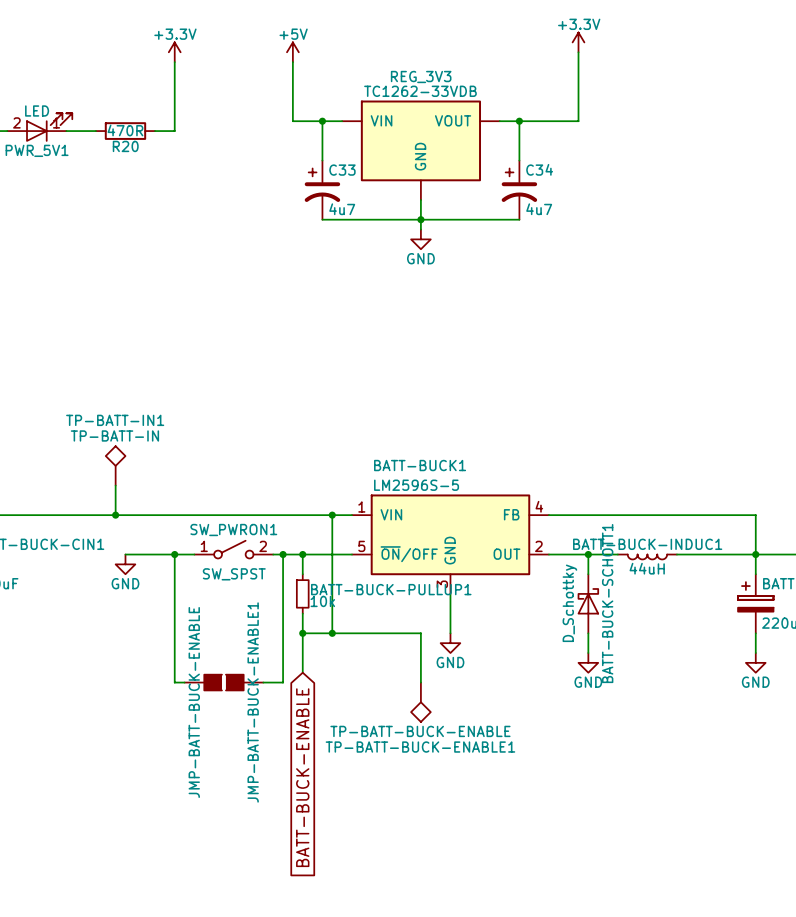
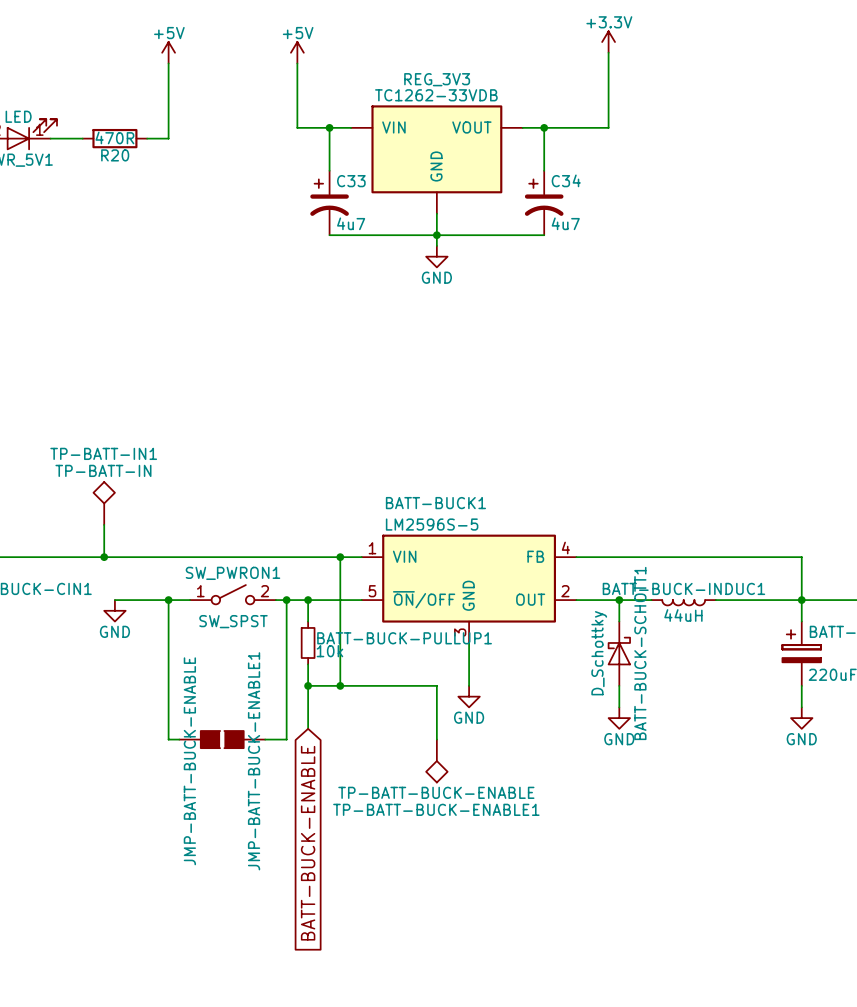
power symbol: +3.3V (174, 52) -> +5V (168, 52)

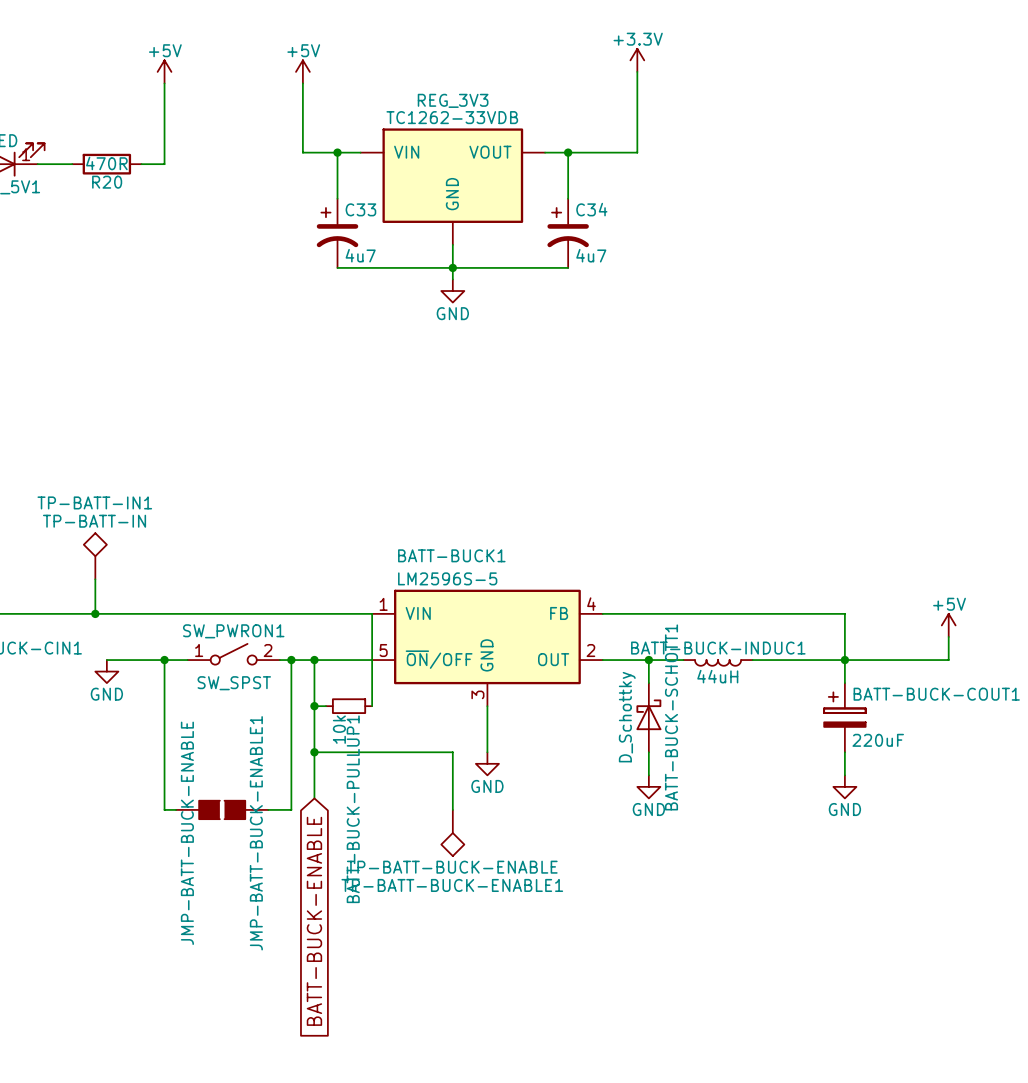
wire: (340, 557) (340, 685) -> none
junction: (340, 557) -> none
wire: none -> (372, 613) (372, 706)
wire: none -> (314, 683) (314, 729)
wire: none -> (314, 706) (325, 706)
BATT-BUCK-PULLUP1 rotation: 0° (308, 642) -> 90° clockwise (349, 706)
BATT-BUCK-PULLUP1 position: (308, 642) -> (349, 706)
junction: none -> (314, 706)
junction: (340, 685) -> none

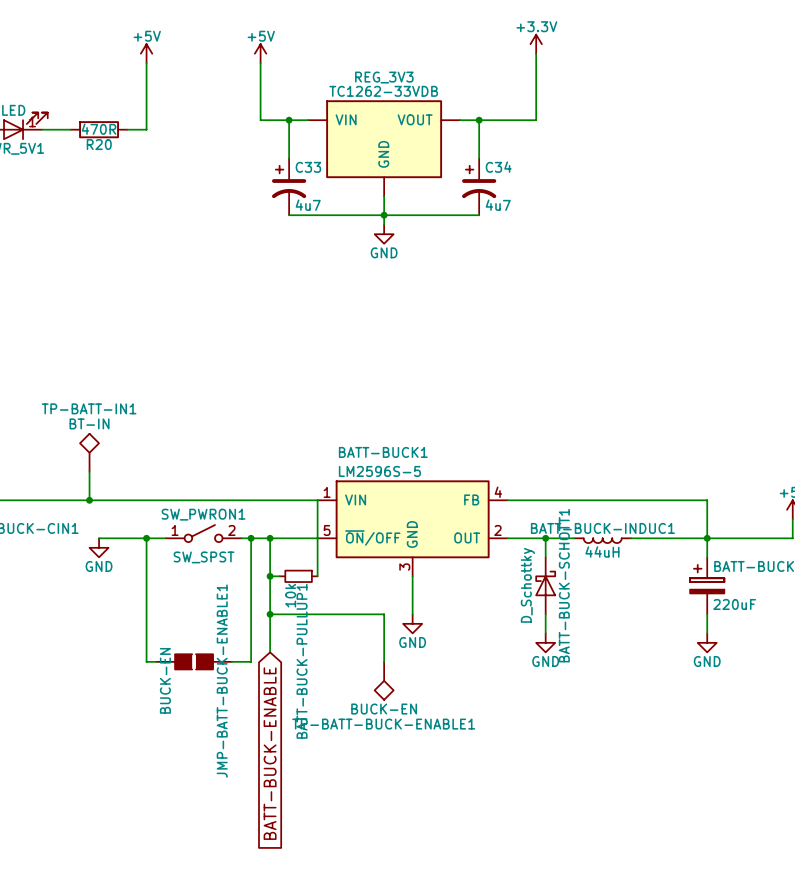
TP-BATT-IN1 value: TP-BATT-IN (94, 521) -> BT-IN (89, 423)
JMP-BATT-BUCK-ENABLE1 value: JMP-BATT-BUCK-ENABLE (187, 833) -> BUCK-EN (165, 680)
TP-BATT-BUCK-ENABLE1 value: TP-BATT-BUCK-ENABLE (452, 867) -> BUCK-EN (384, 709)

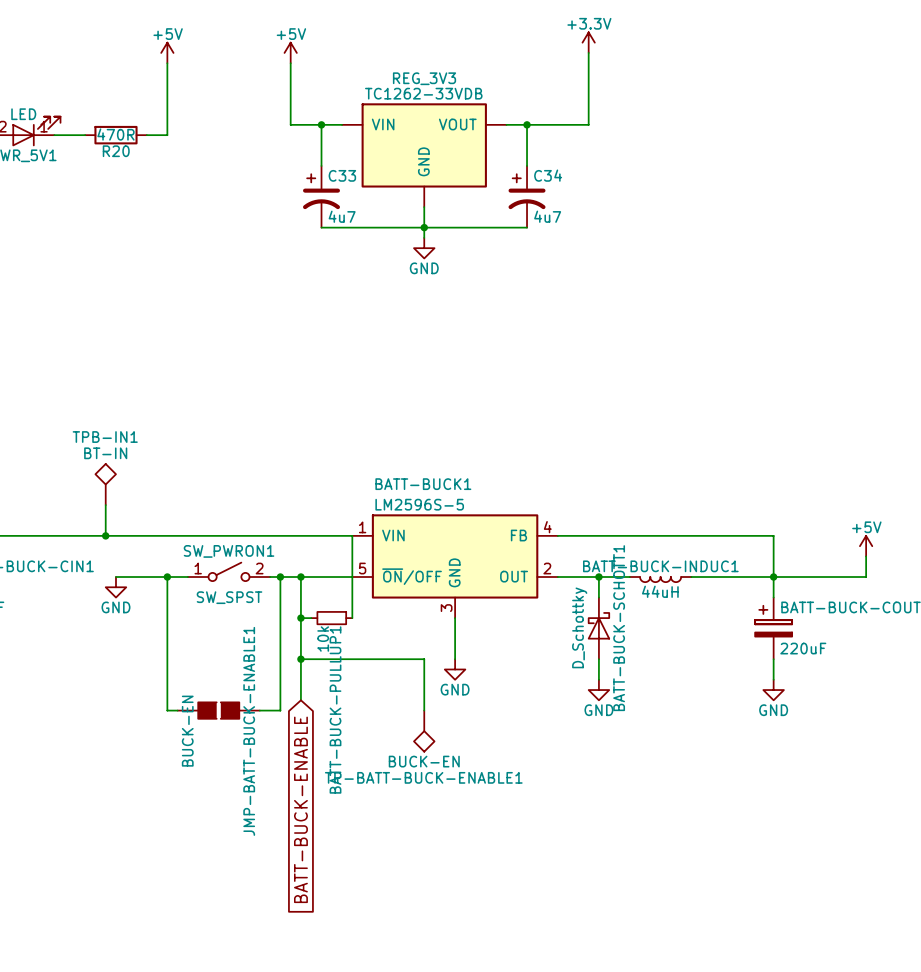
TP-BATT-IN1 name: TP-BATT-IN1 (89, 408) -> TPB-IN1 (105, 437)

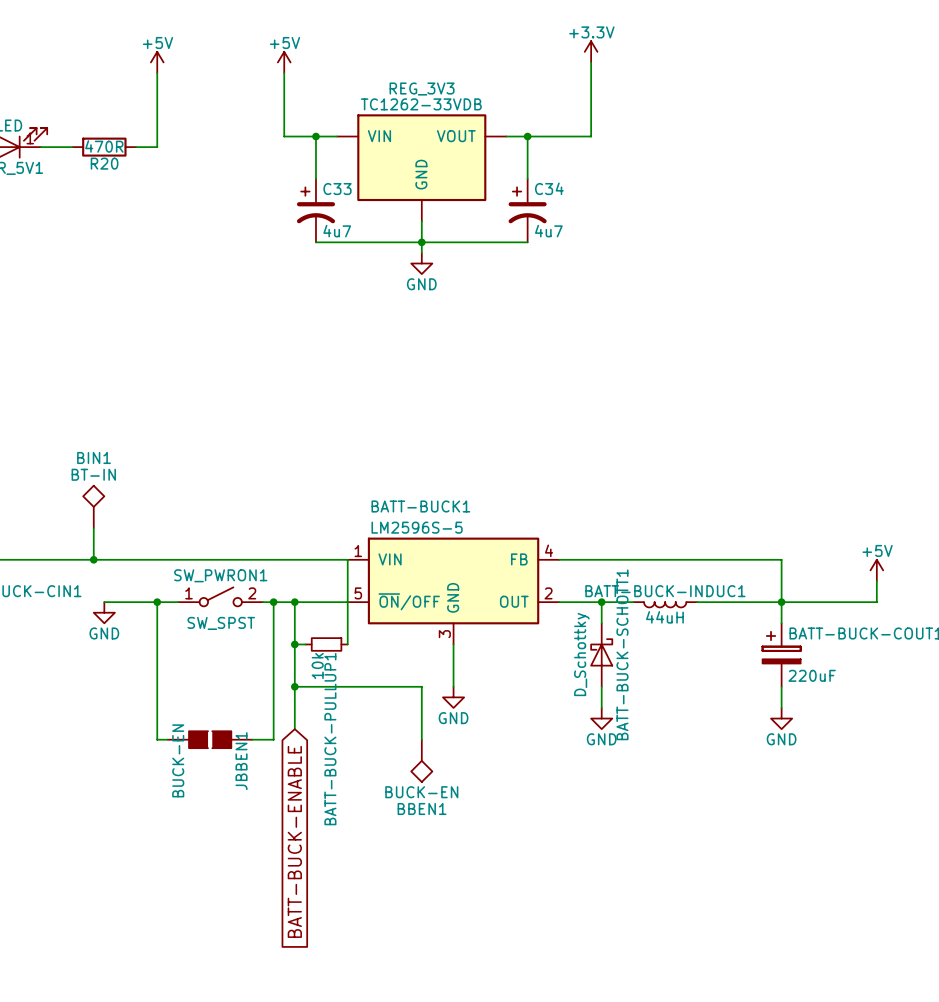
TPB-IN1 name: TPB-IN1 (105, 437) -> BIN1 (94, 457)
JMP-BATT-BUCK-ENABLE1 name: JMP-BATT-BUCK-ENABLE1 (249, 731) -> JBBEN1 (241, 761)
TP-BATT-BUCK-ENABLE1 name: TP-BATT-BUCK-ENABLE1 (423, 777) -> BBEN1 (422, 808)

